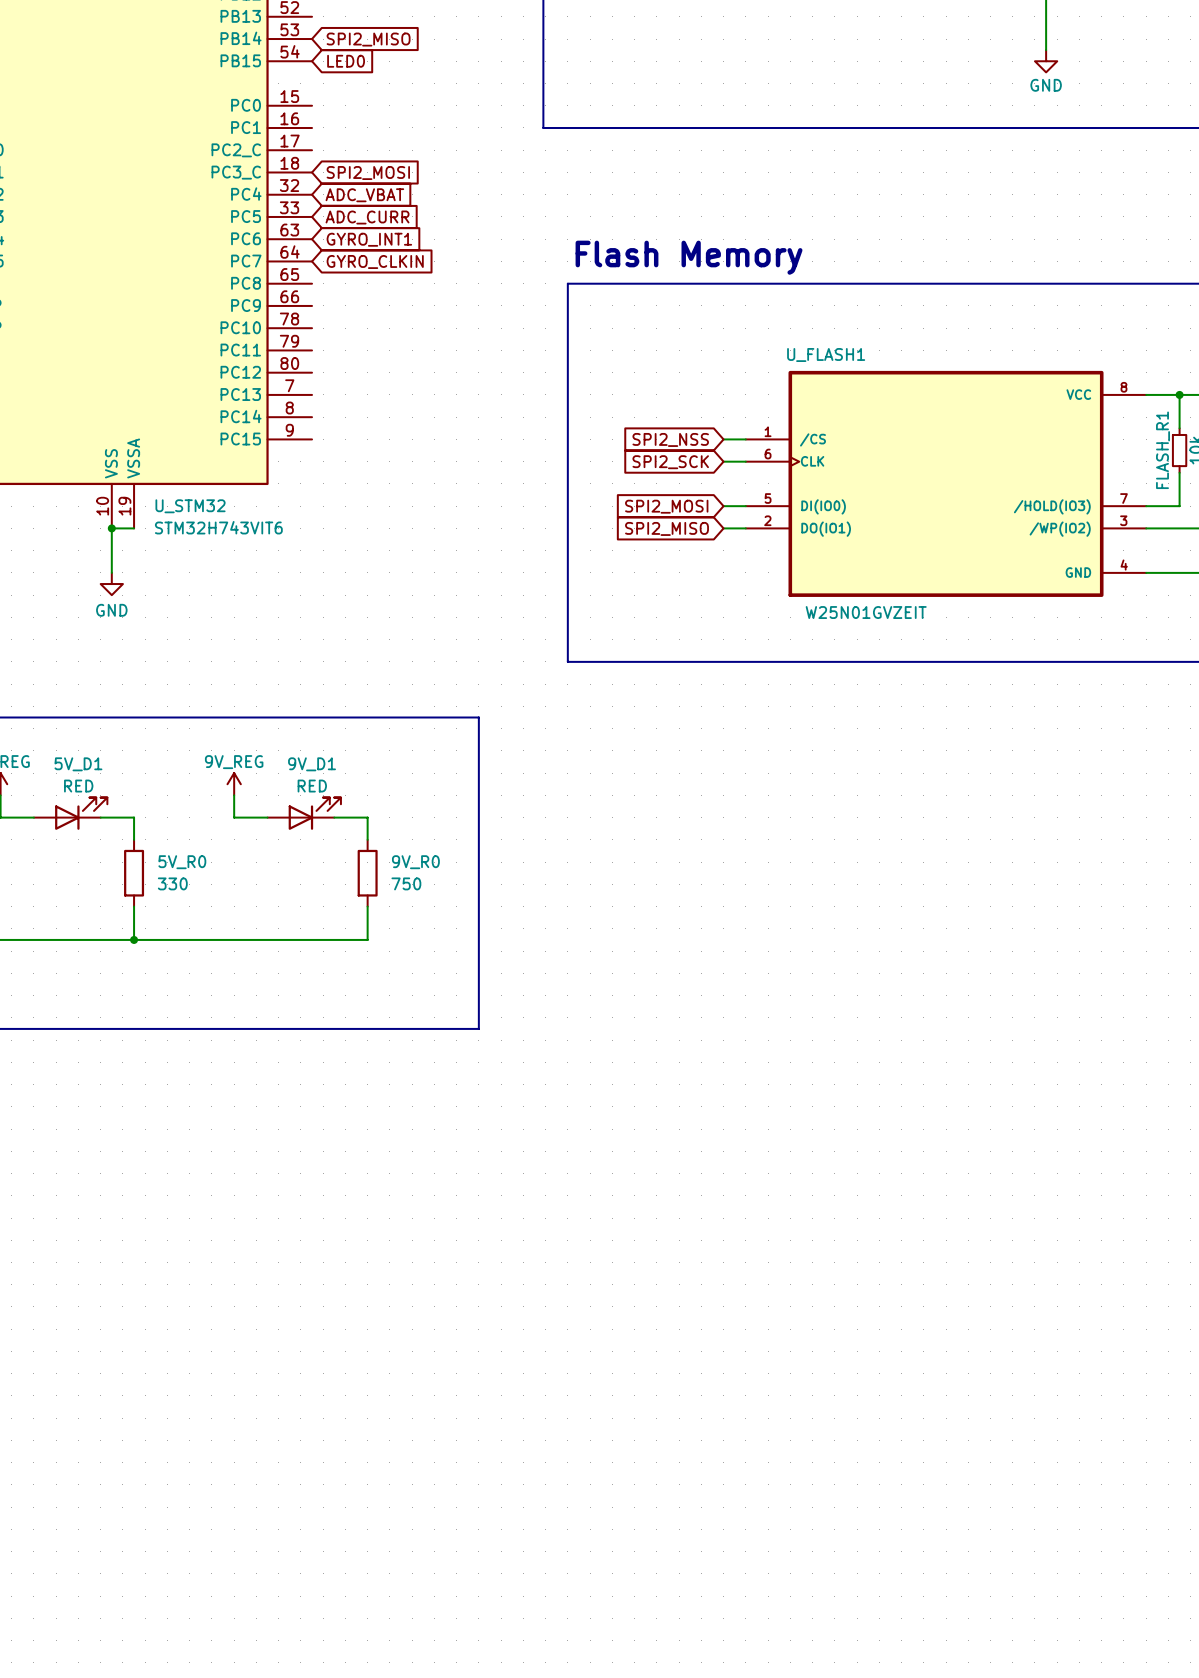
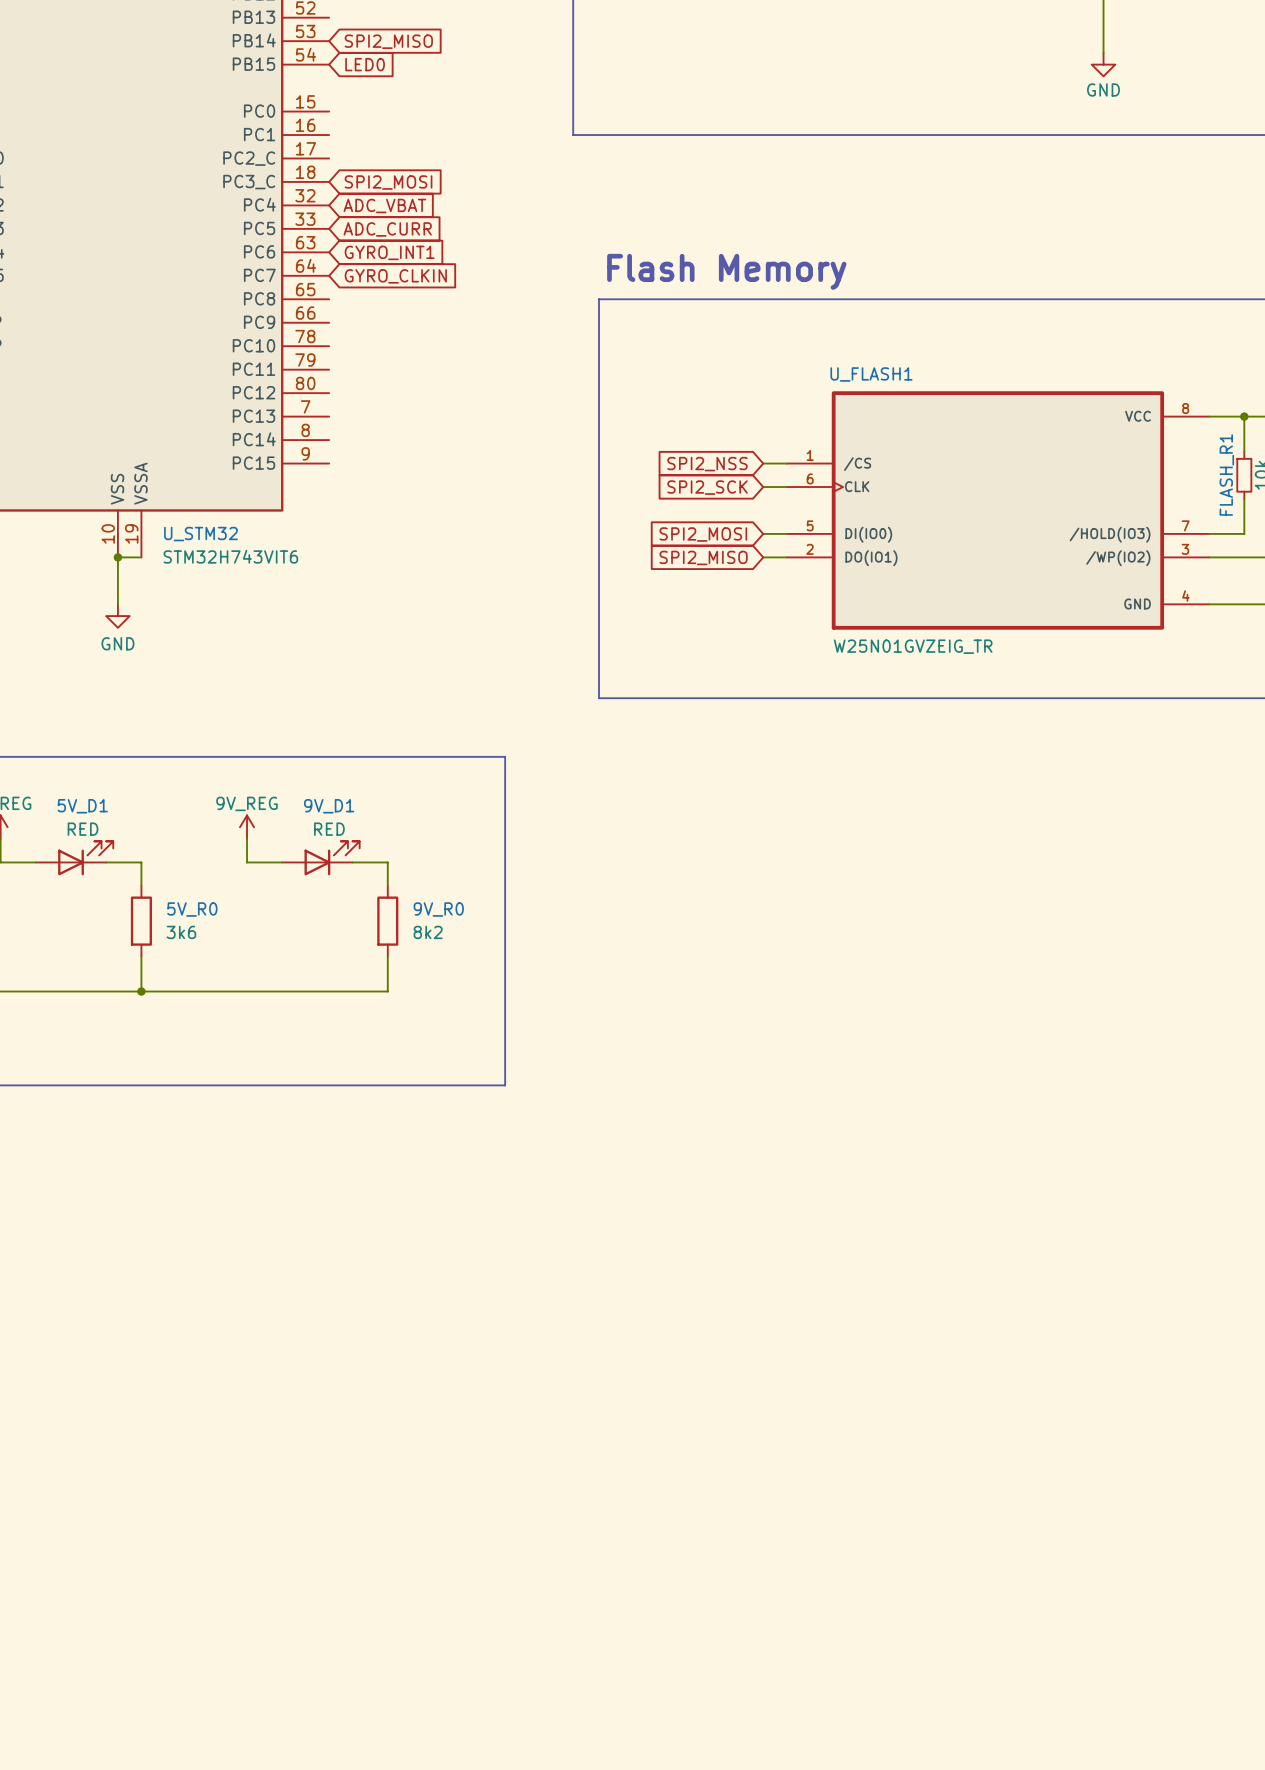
U_FLASH1 value: W25N01GVZEIT (866, 612) -> W25N01GVZEIG_TR (913, 646)
5V_R0 value: 330 (172, 883) -> 3k6 (181, 932)
9V_R0 value: 750 (406, 883) -> 8k2 (428, 932)

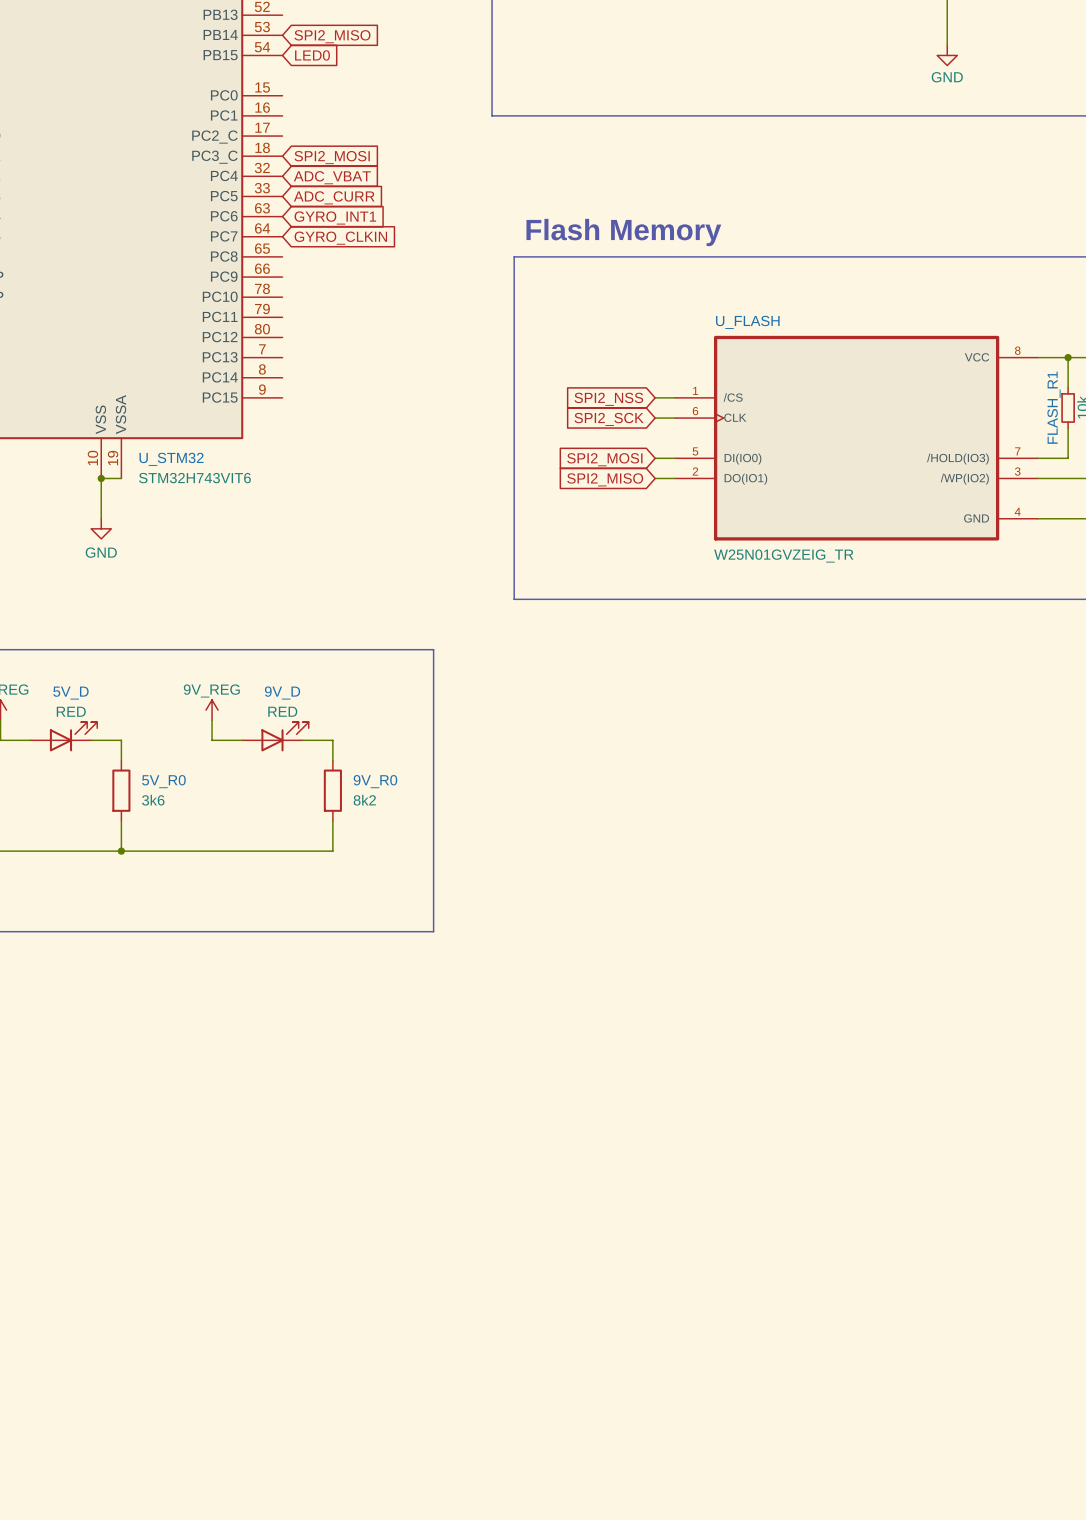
U_FLASH1 name: U_FLASH1 (871, 374) -> U_FLASH (747, 322)
5V_D1 name: 5V_D1 (82, 806) -> 5V_D (70, 693)
9V_D1 name: 9V_D1 (329, 806) -> 9V_D (282, 692)

